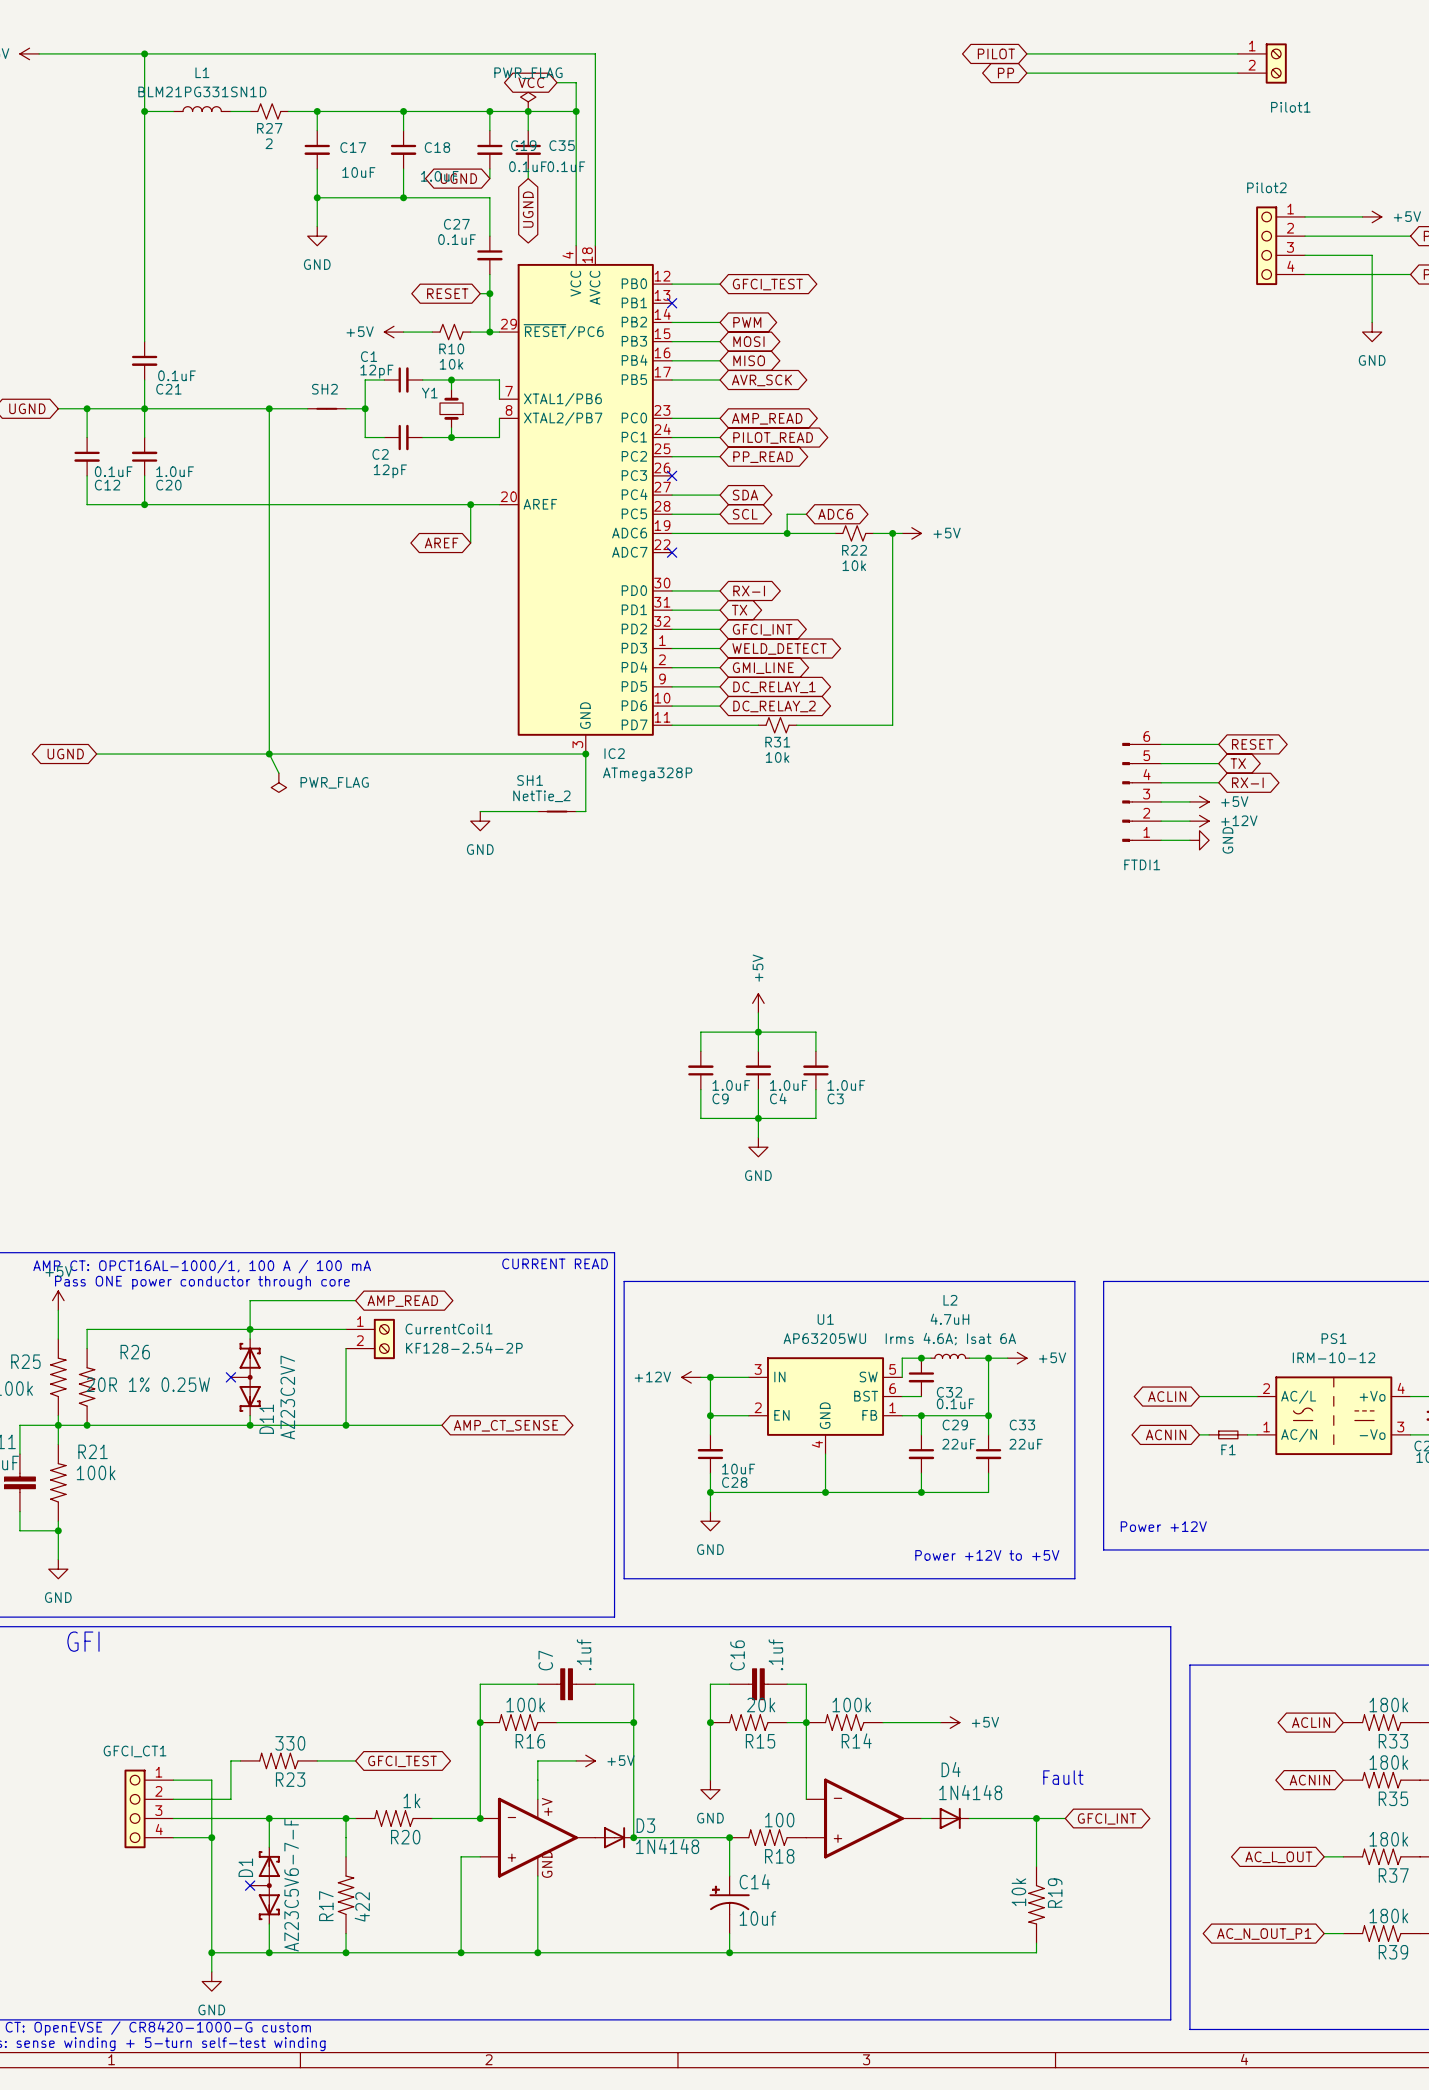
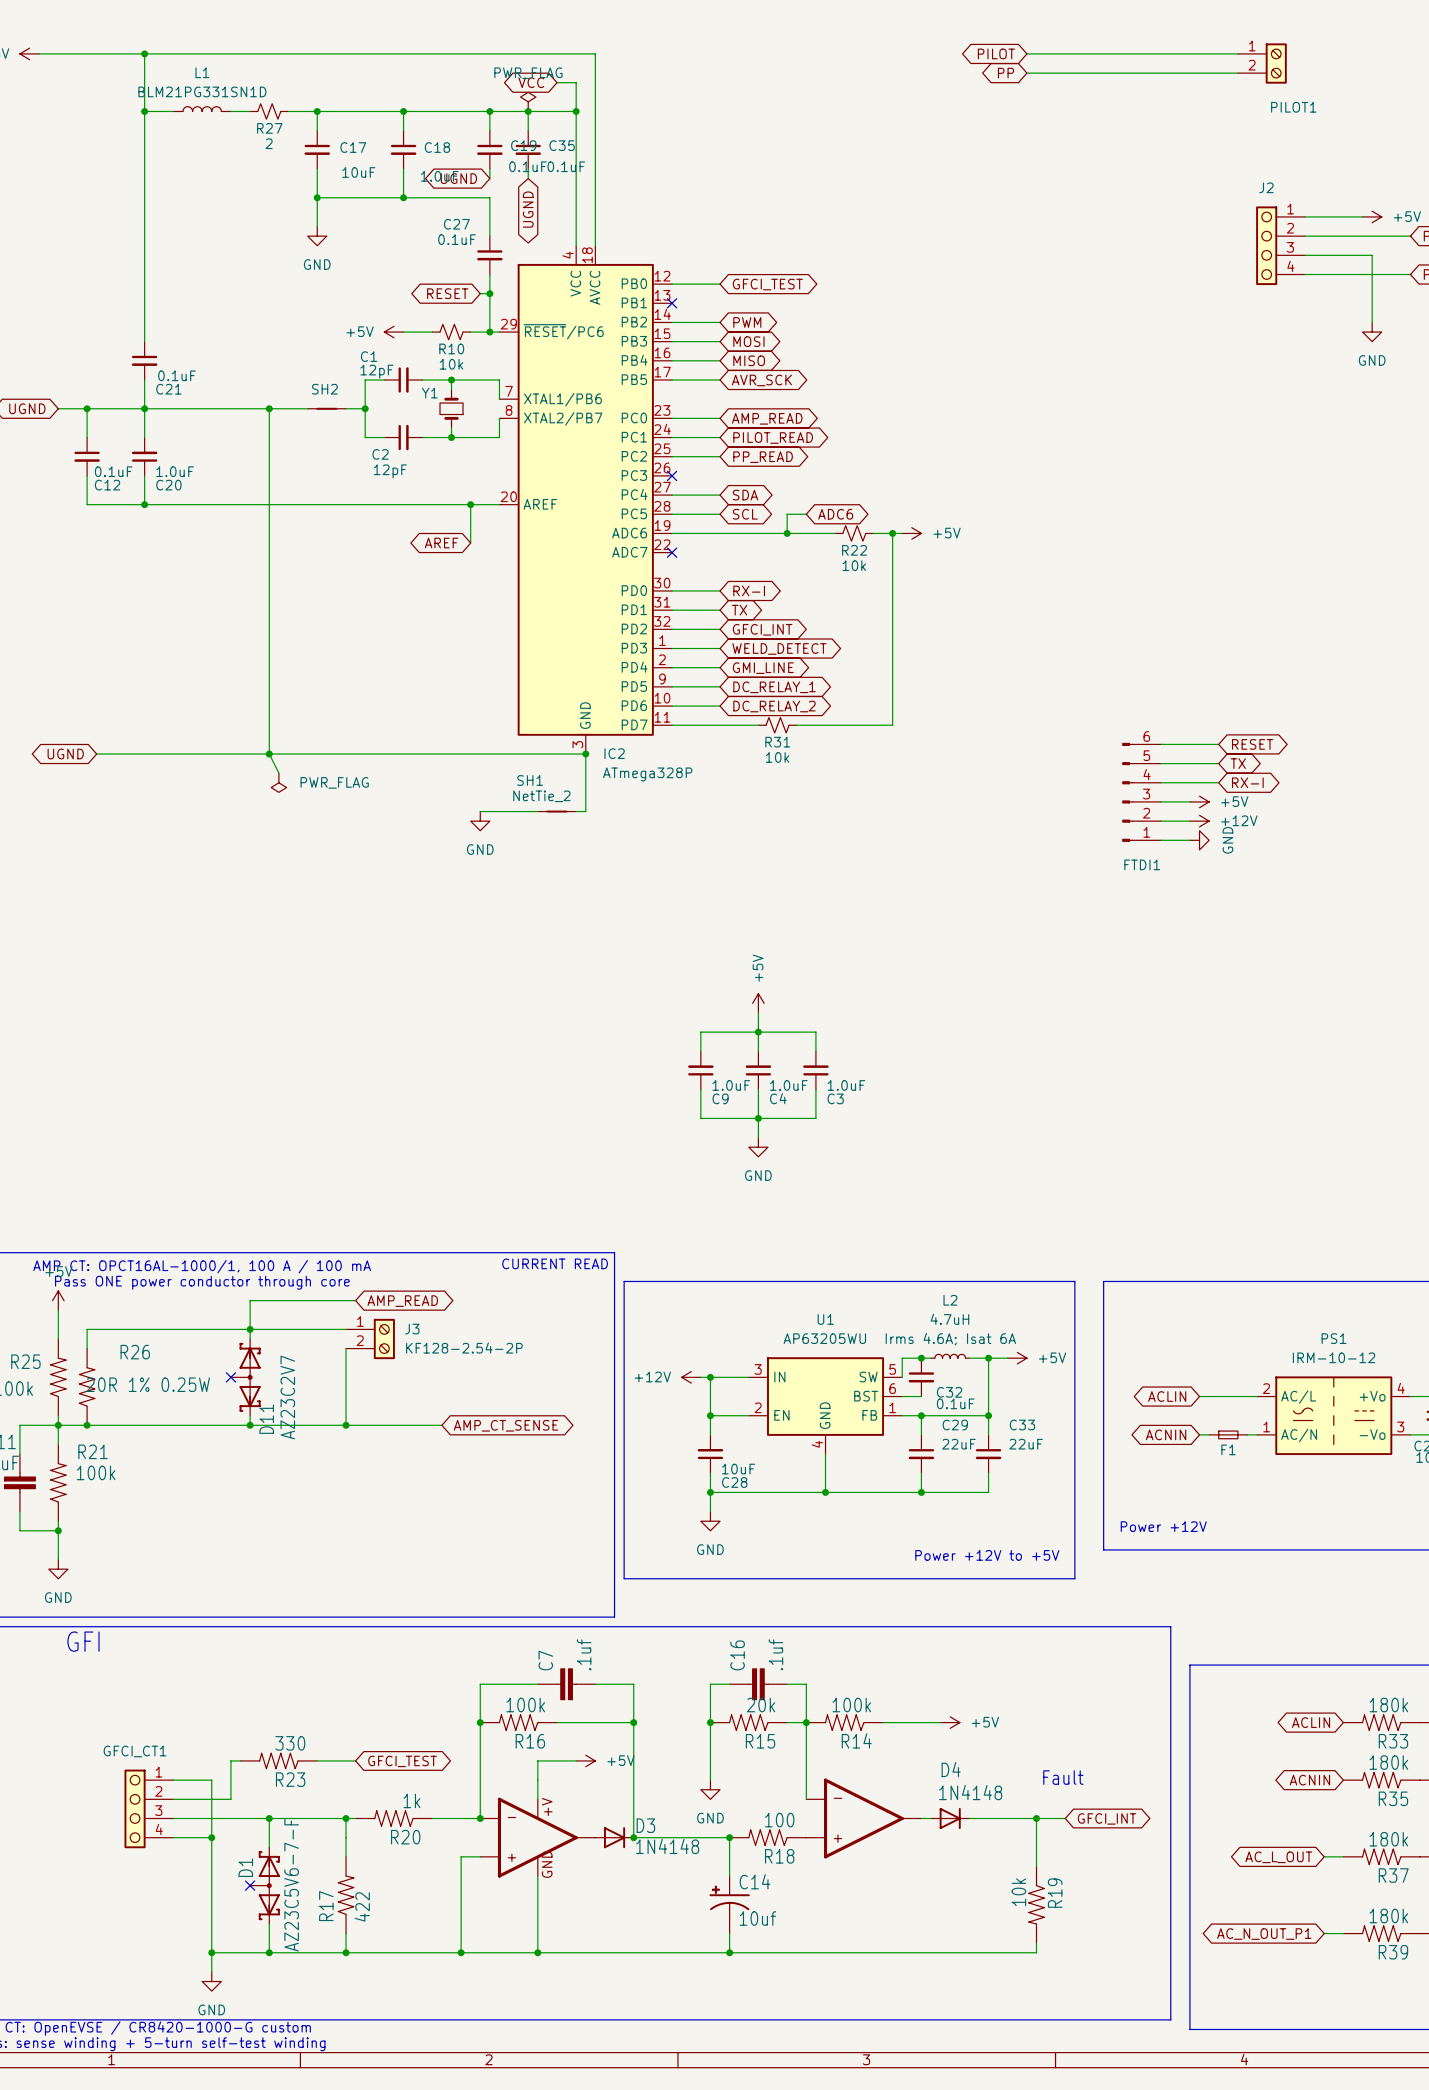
Pilot1 name: Pilot1 (1290, 107) -> PILOT1 (1293, 107)
Pilot2 name: Pilot2 (1266, 187) -> J2 (1266, 187)
CurrentCoil1 name: CurrentCoil1 (449, 1329) -> J3 (412, 1329)

